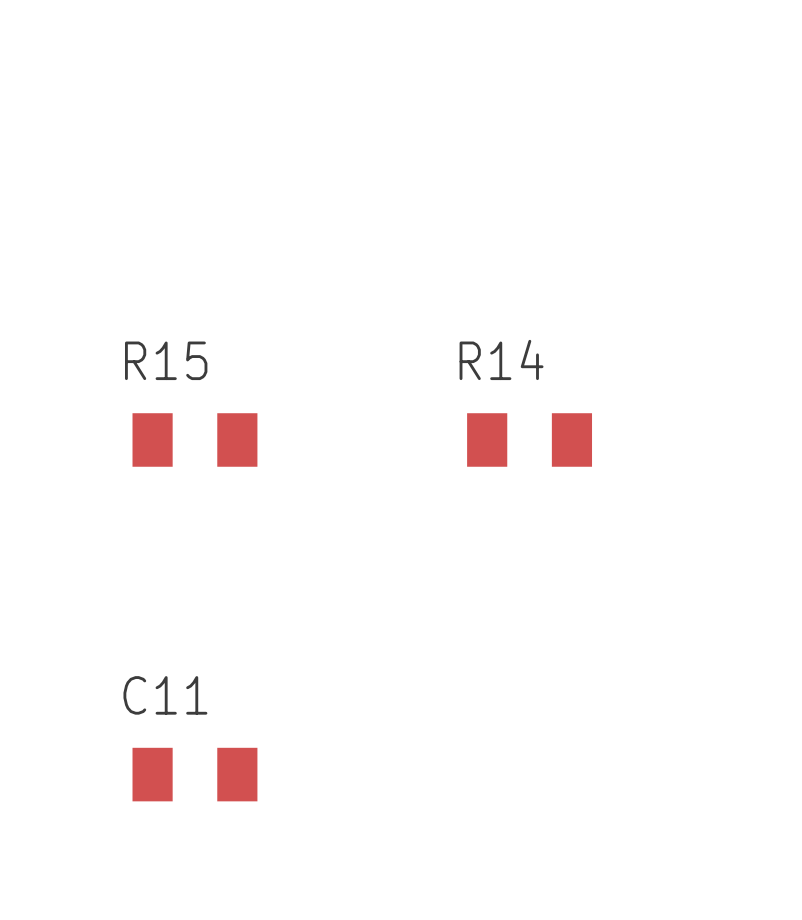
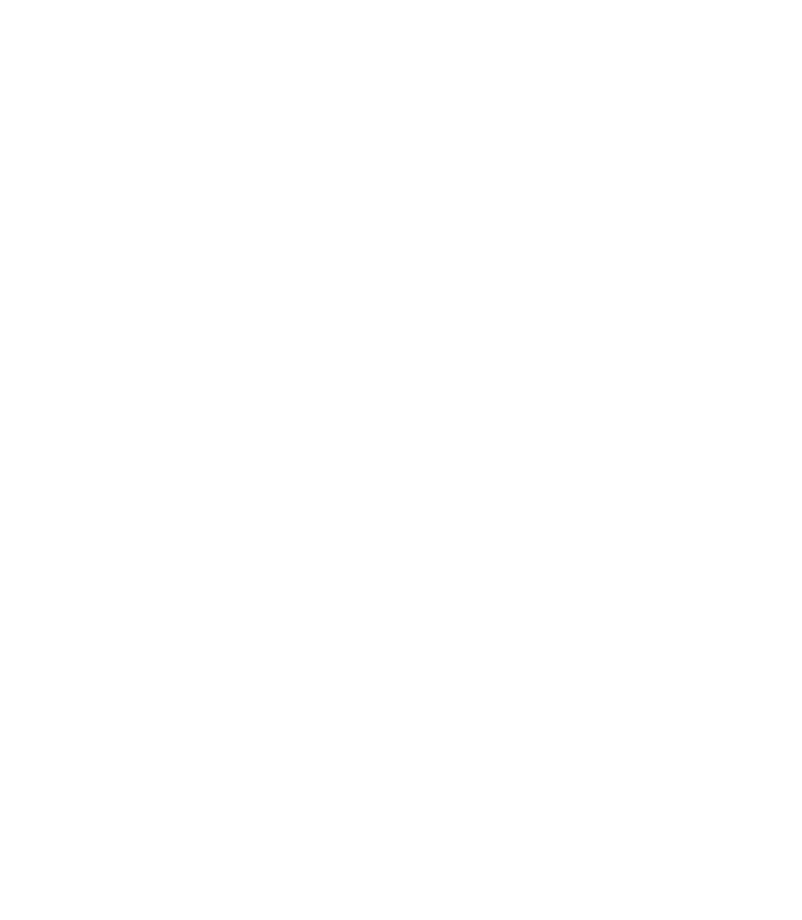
R15: (194, 439) -> none
R14: (529, 439) -> none
C11: (194, 774) -> none

